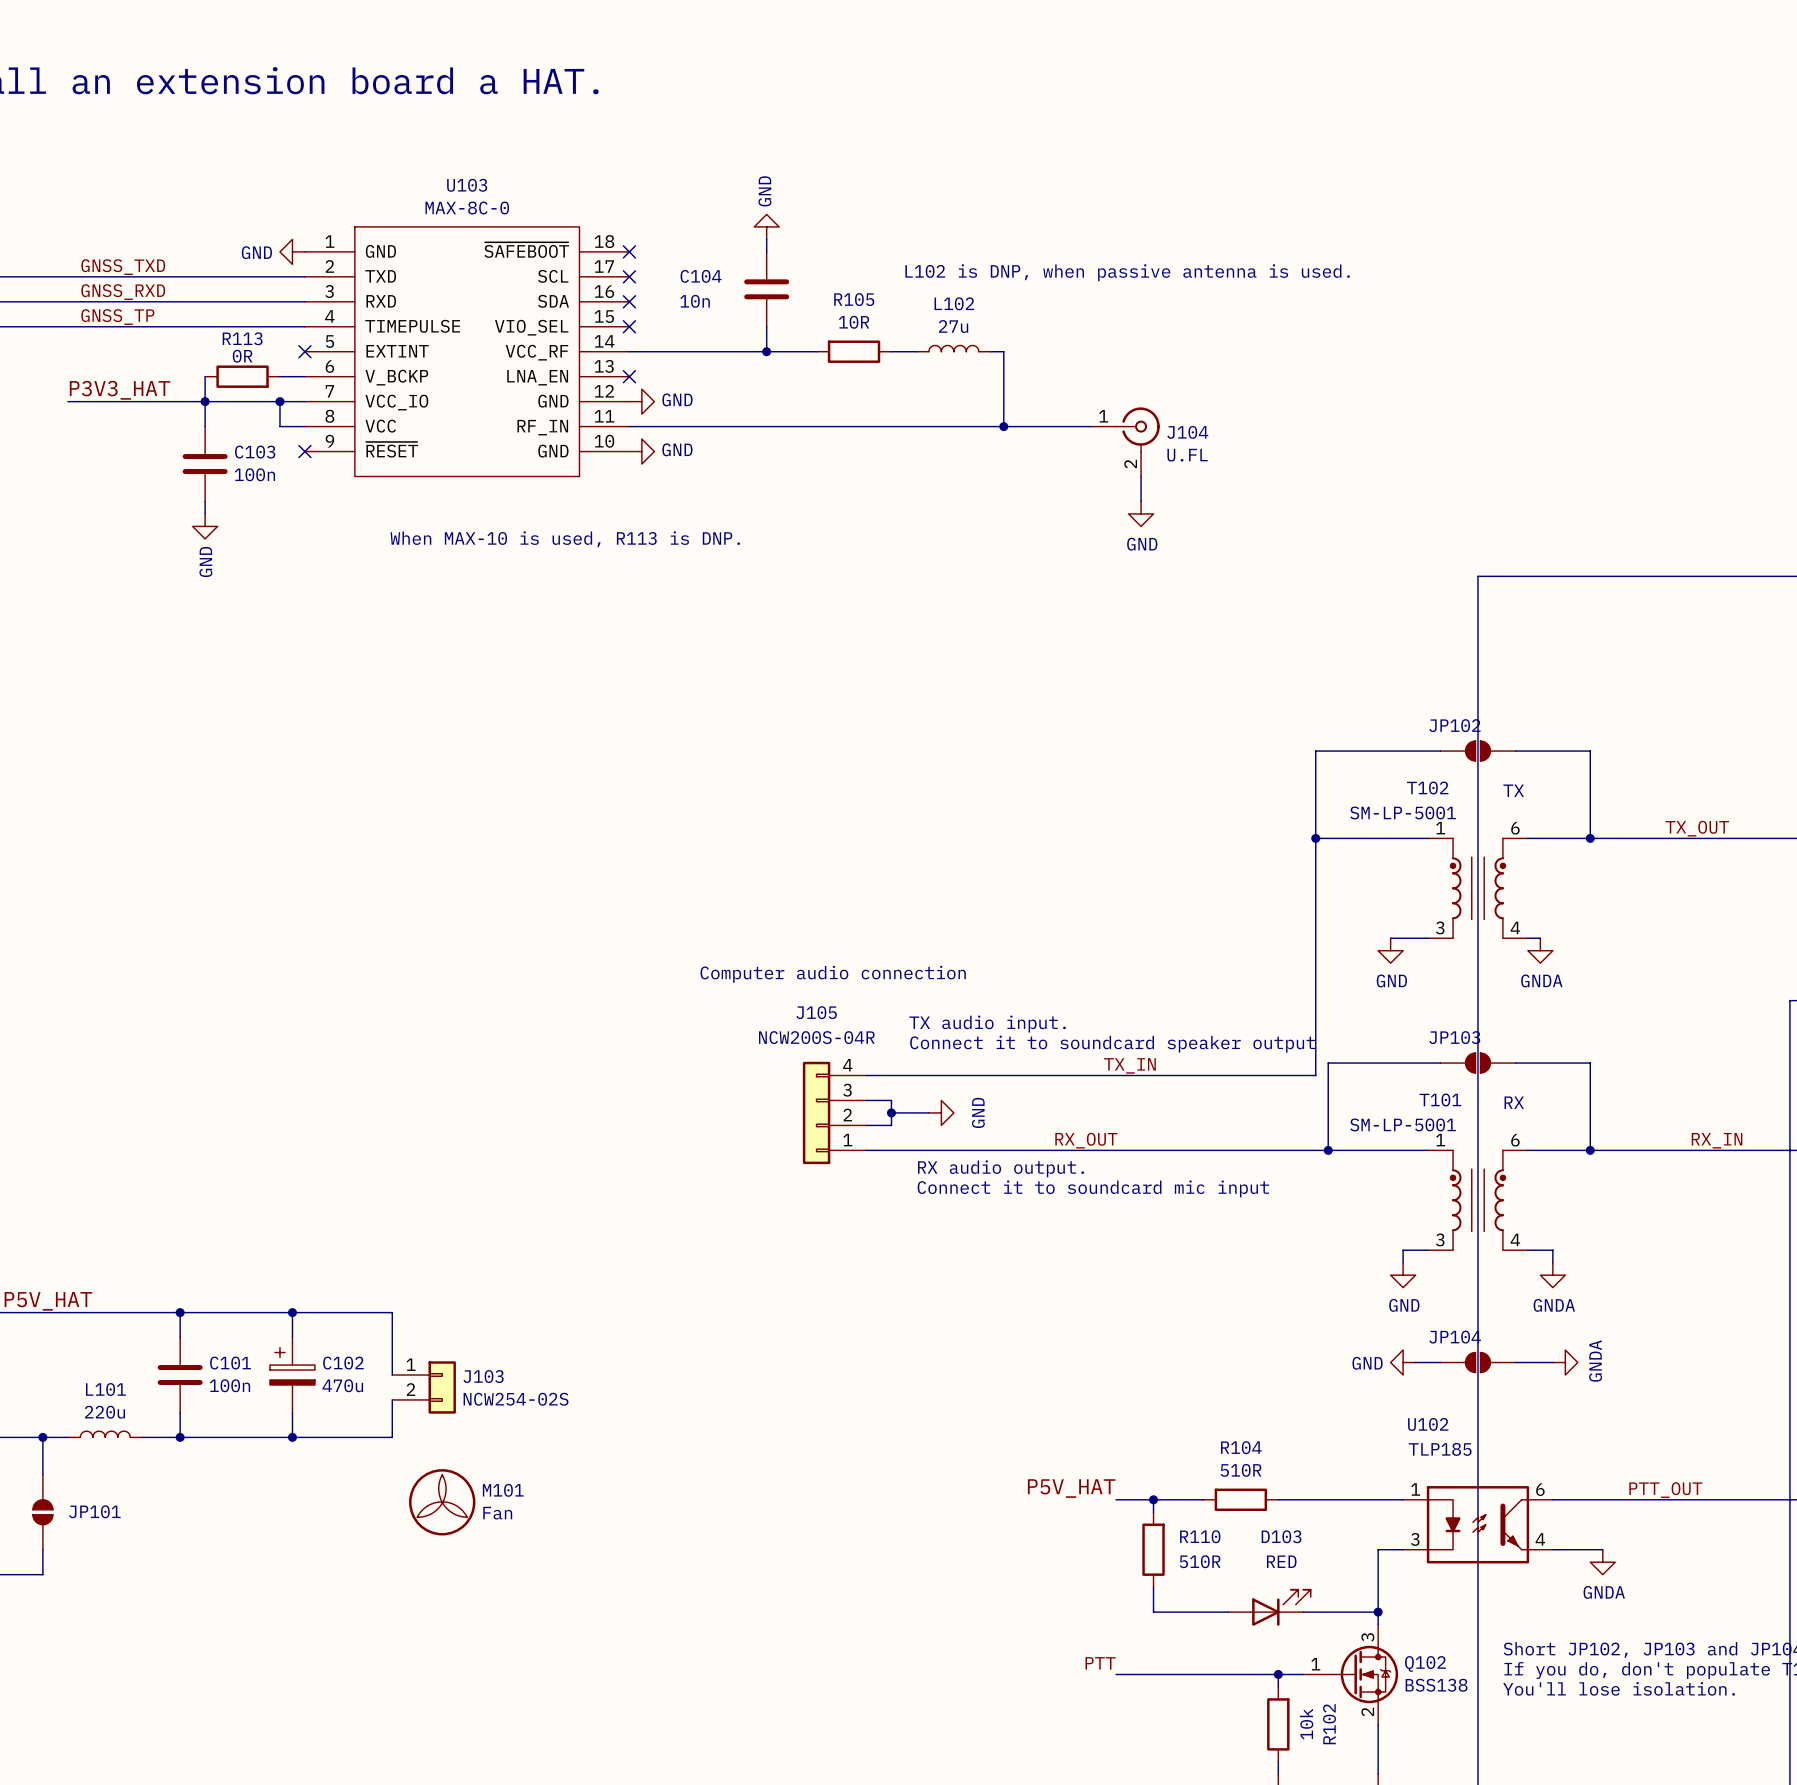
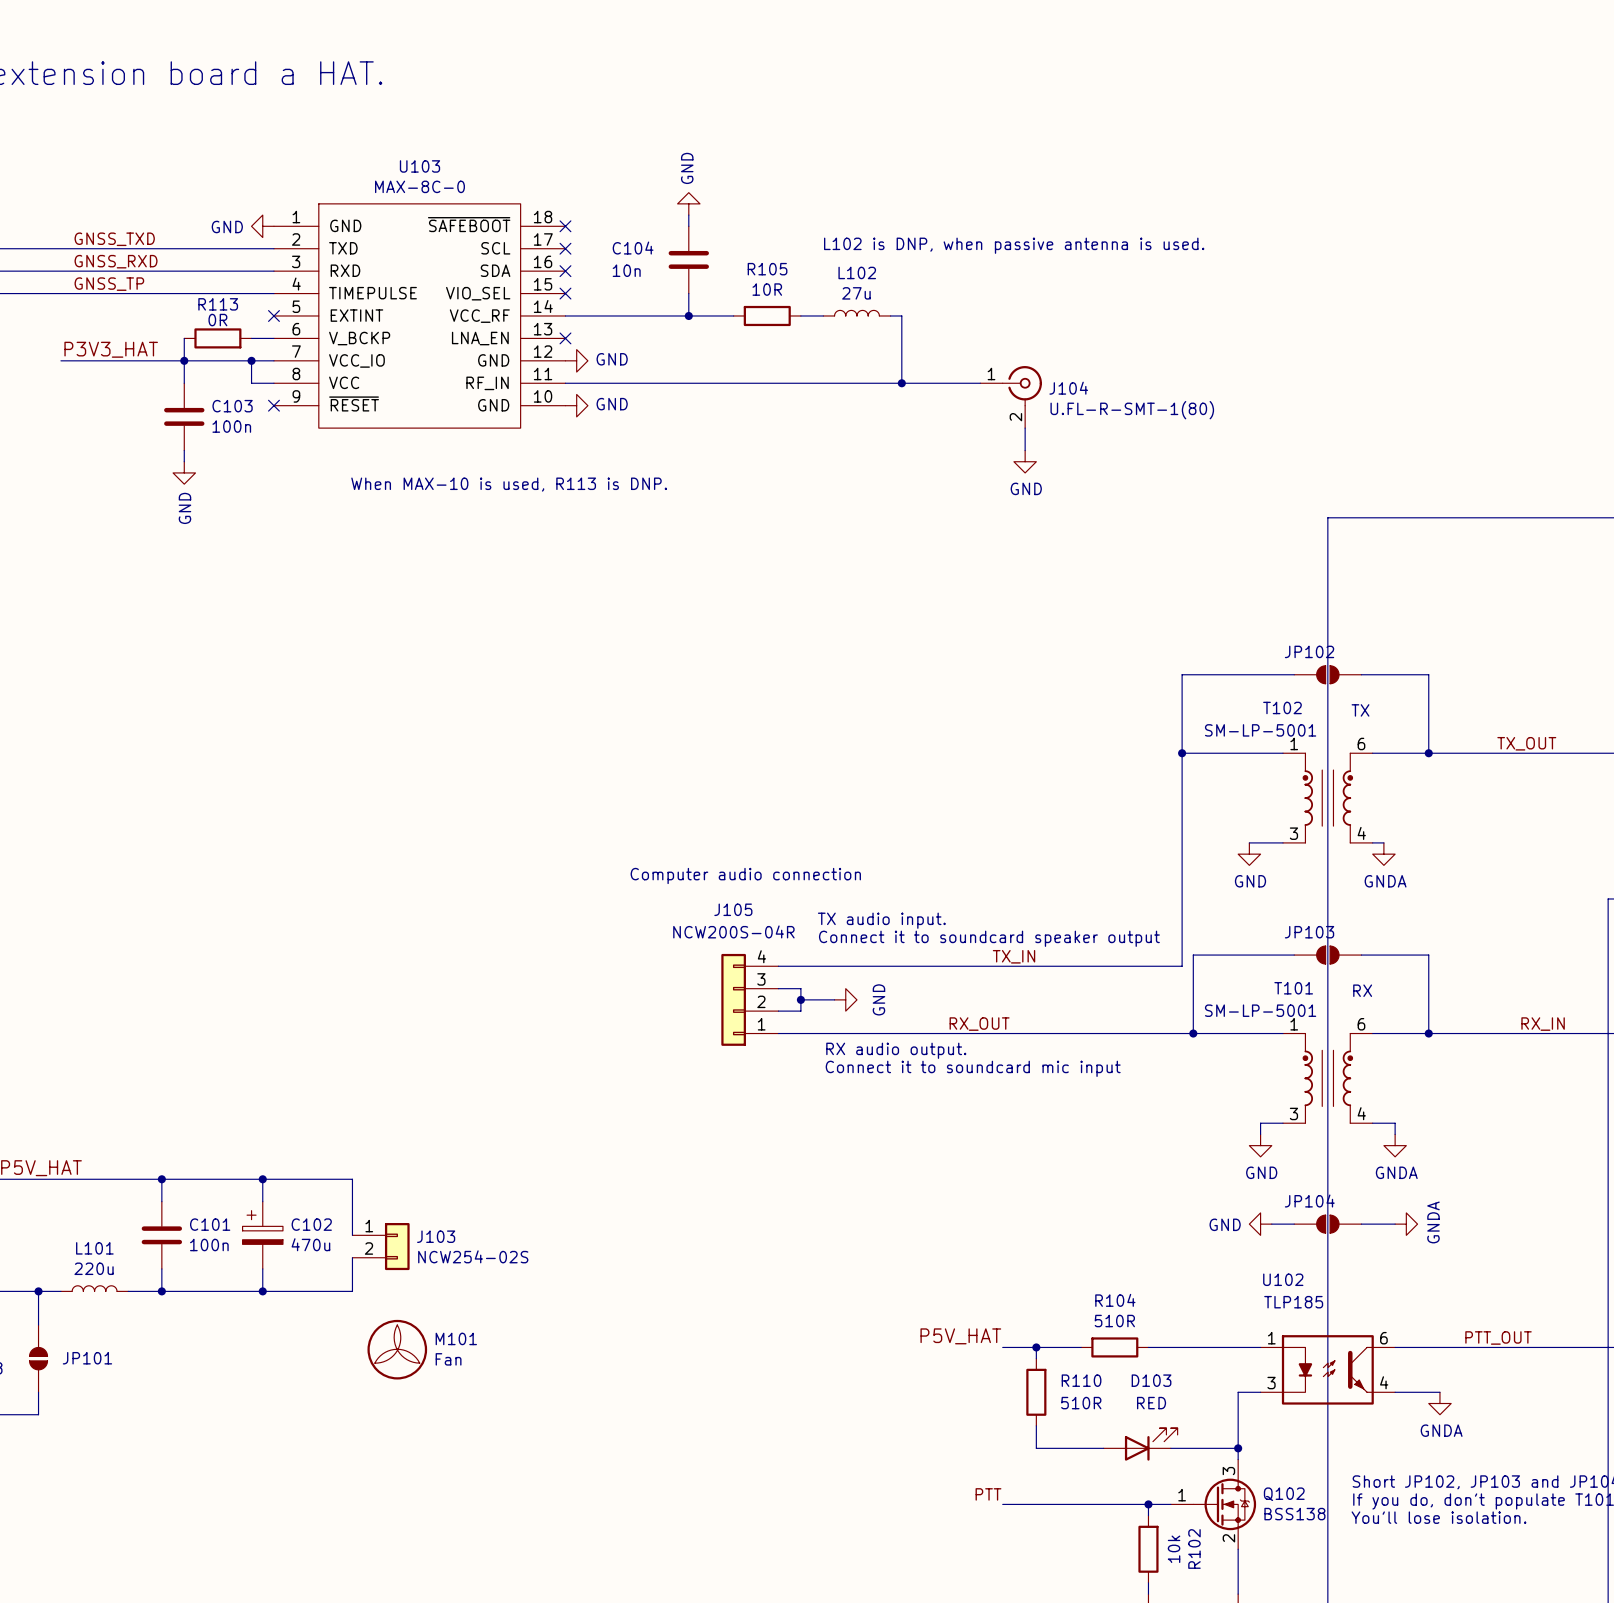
J104 value: U.FL (1187, 455) -> U.FL-R-SMT-1(80) (1132, 410)

